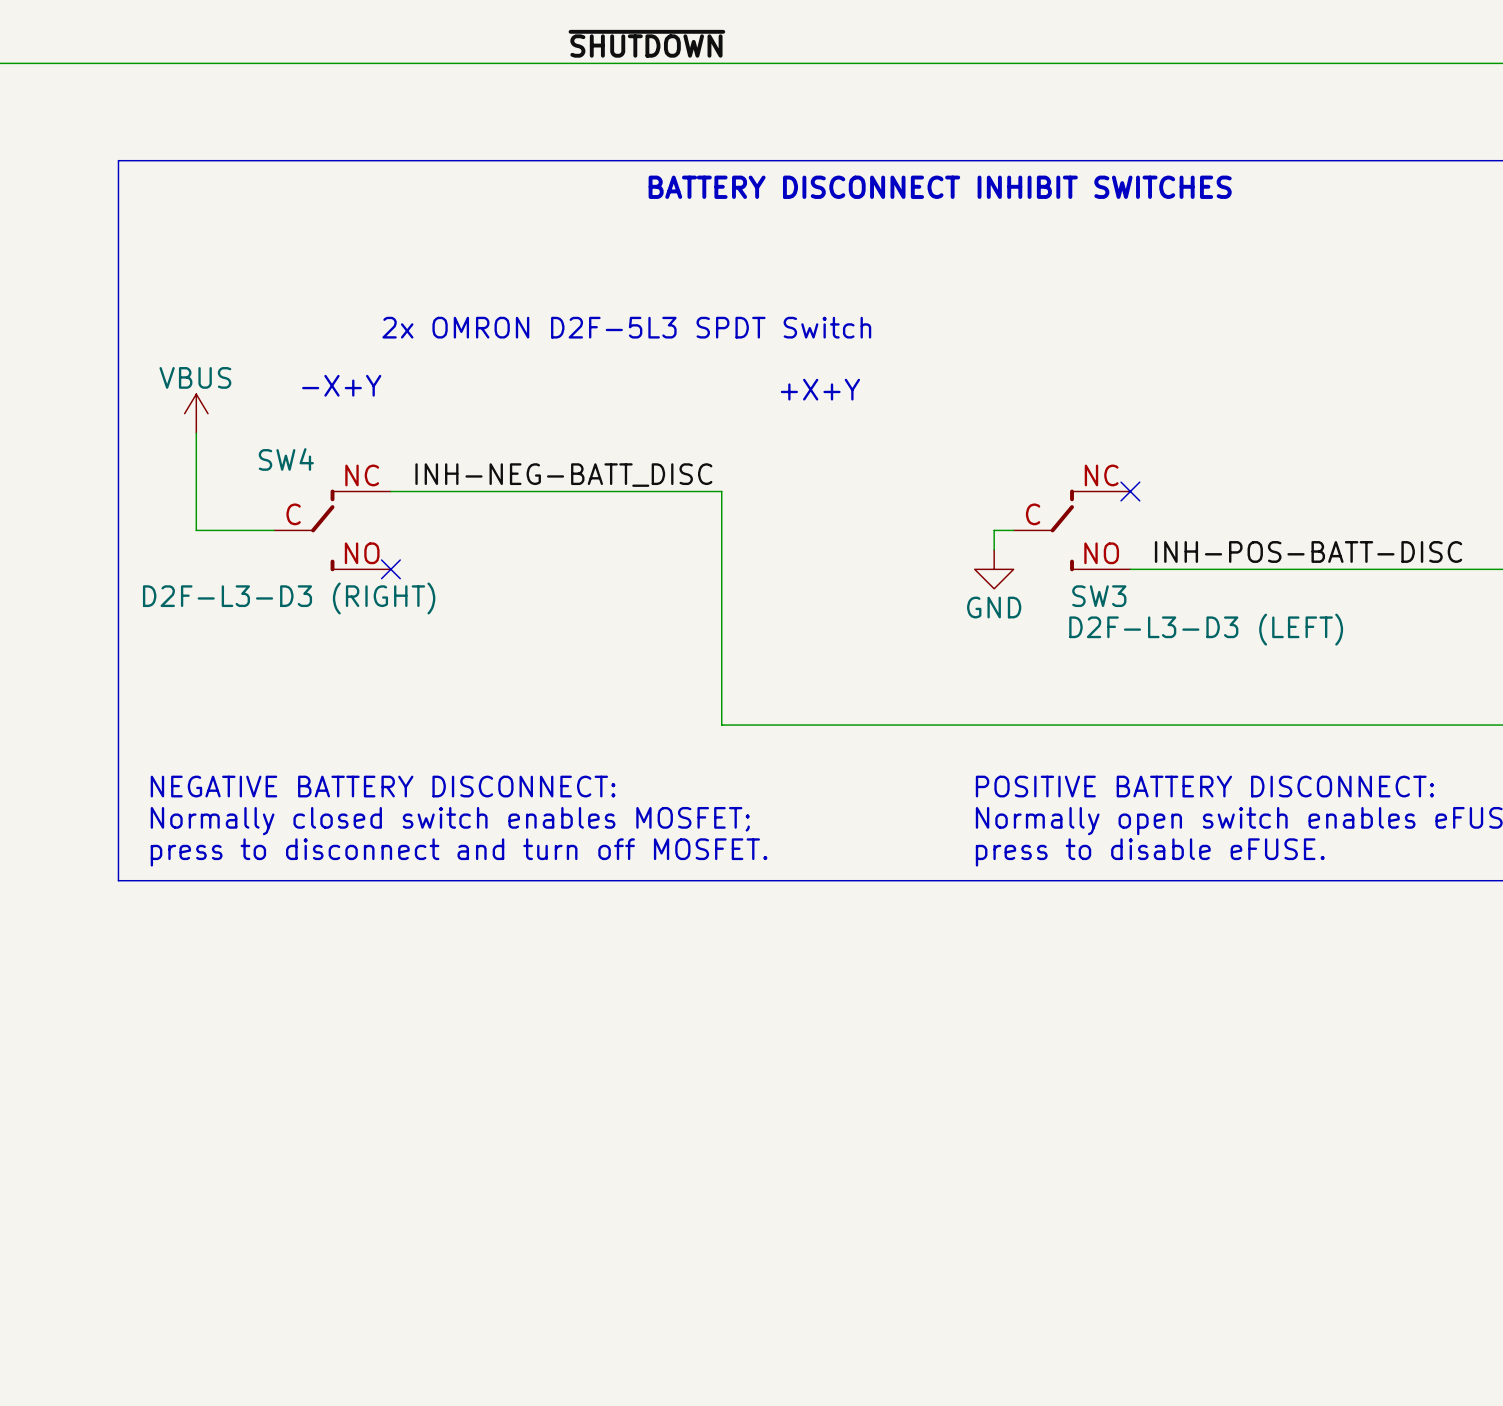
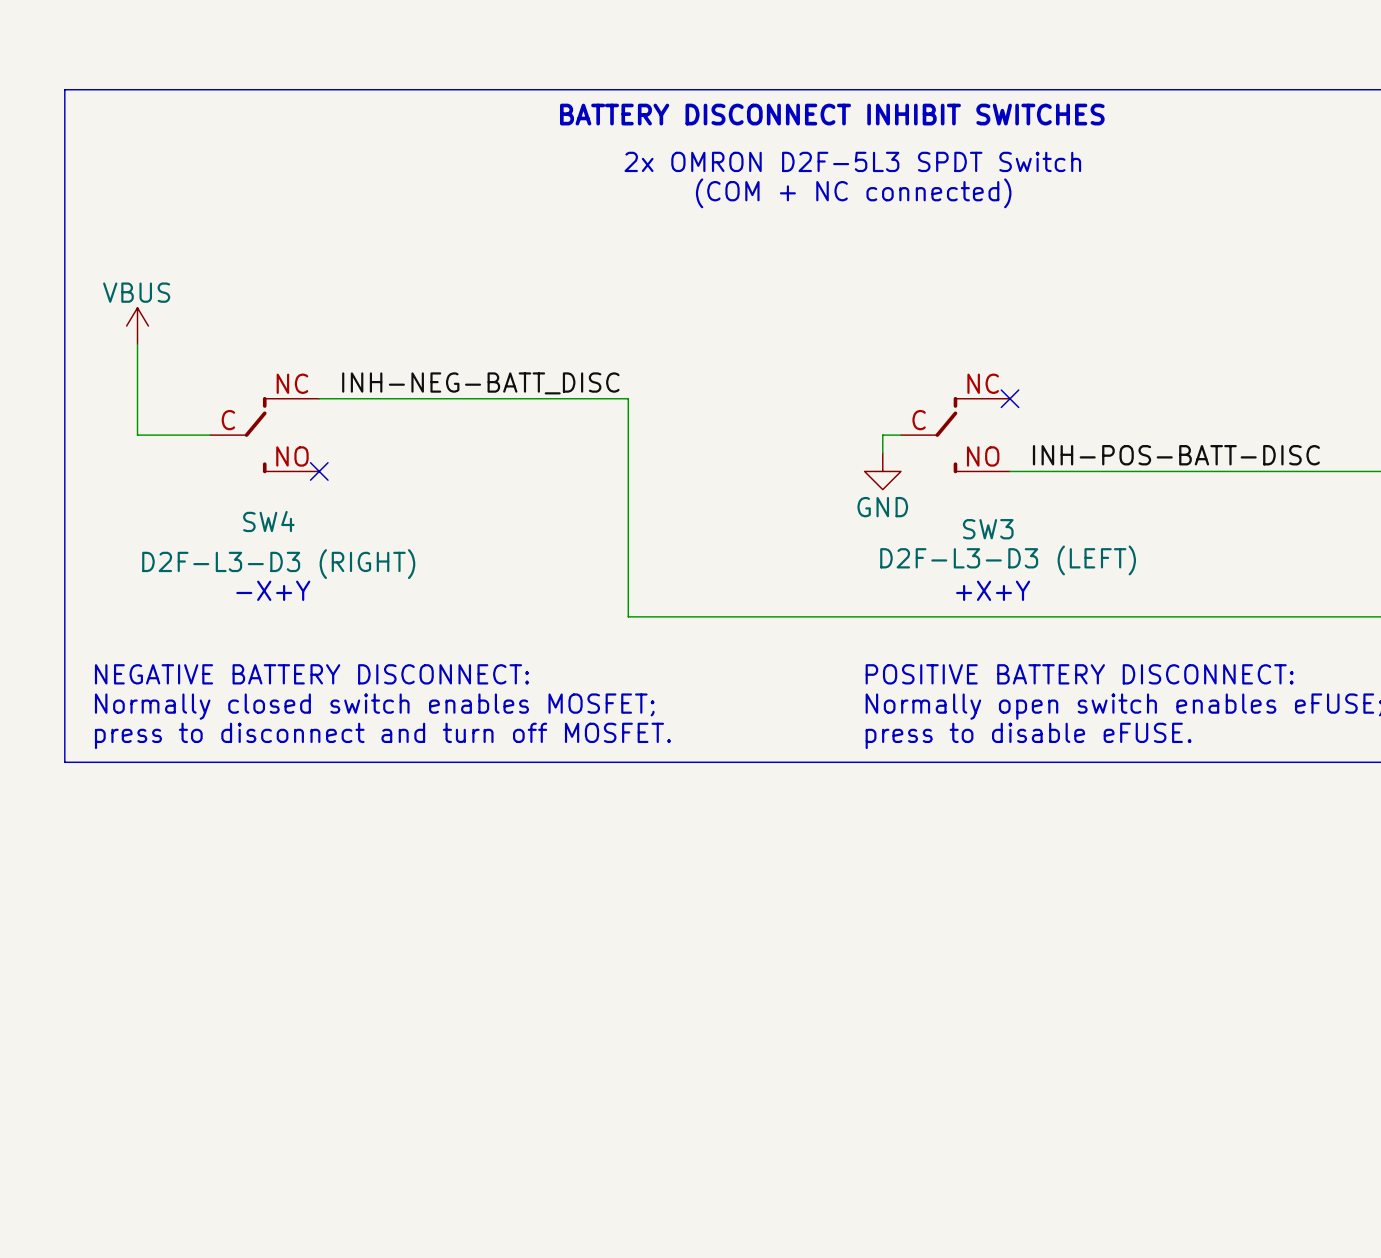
text: none -> 2x OMRON D2F-5L3 SPDT Switch (852, 161)
text: none -> (COM + NC connected) (853, 193)
text: 2x OMRON D2F-5L3 SPDT Switch (626, 327) -> none
text position: -X+Y (341, 385) -> -X+Y (273, 590)
text: +X+Y (820, 389) -> none
SW4 name position: SW4 (286, 459) -> SW4 (268, 521)
SW3 name position: SW3 (1099, 596) -> SW3 (988, 529)
SW4 value position: D2F-L3-D3 (RIGHT) (289, 598) -> D2F-L3-D3 (RIGHT) (278, 564)
SW3 value position: D2F-L3-D3 (LEFT) (1206, 629) -> D2F-L3-D3 (LEFT) (1008, 560)
text: none -> +X+Y (993, 590)

